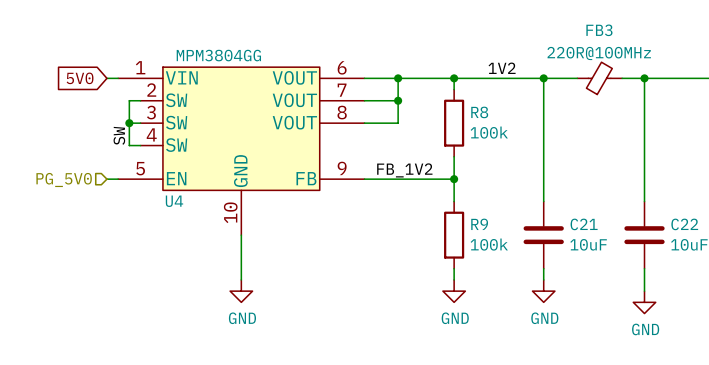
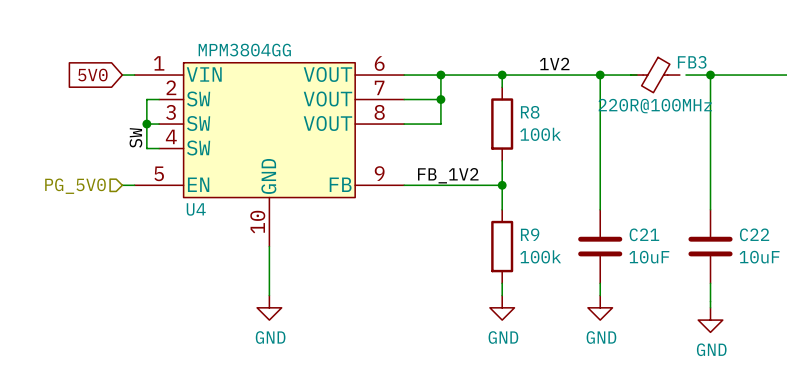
FB3 name position: FB3 (599, 30) -> FB3 (692, 62)
FB3 rotation: 0° (599, 78) -> 180° (655, 75)

